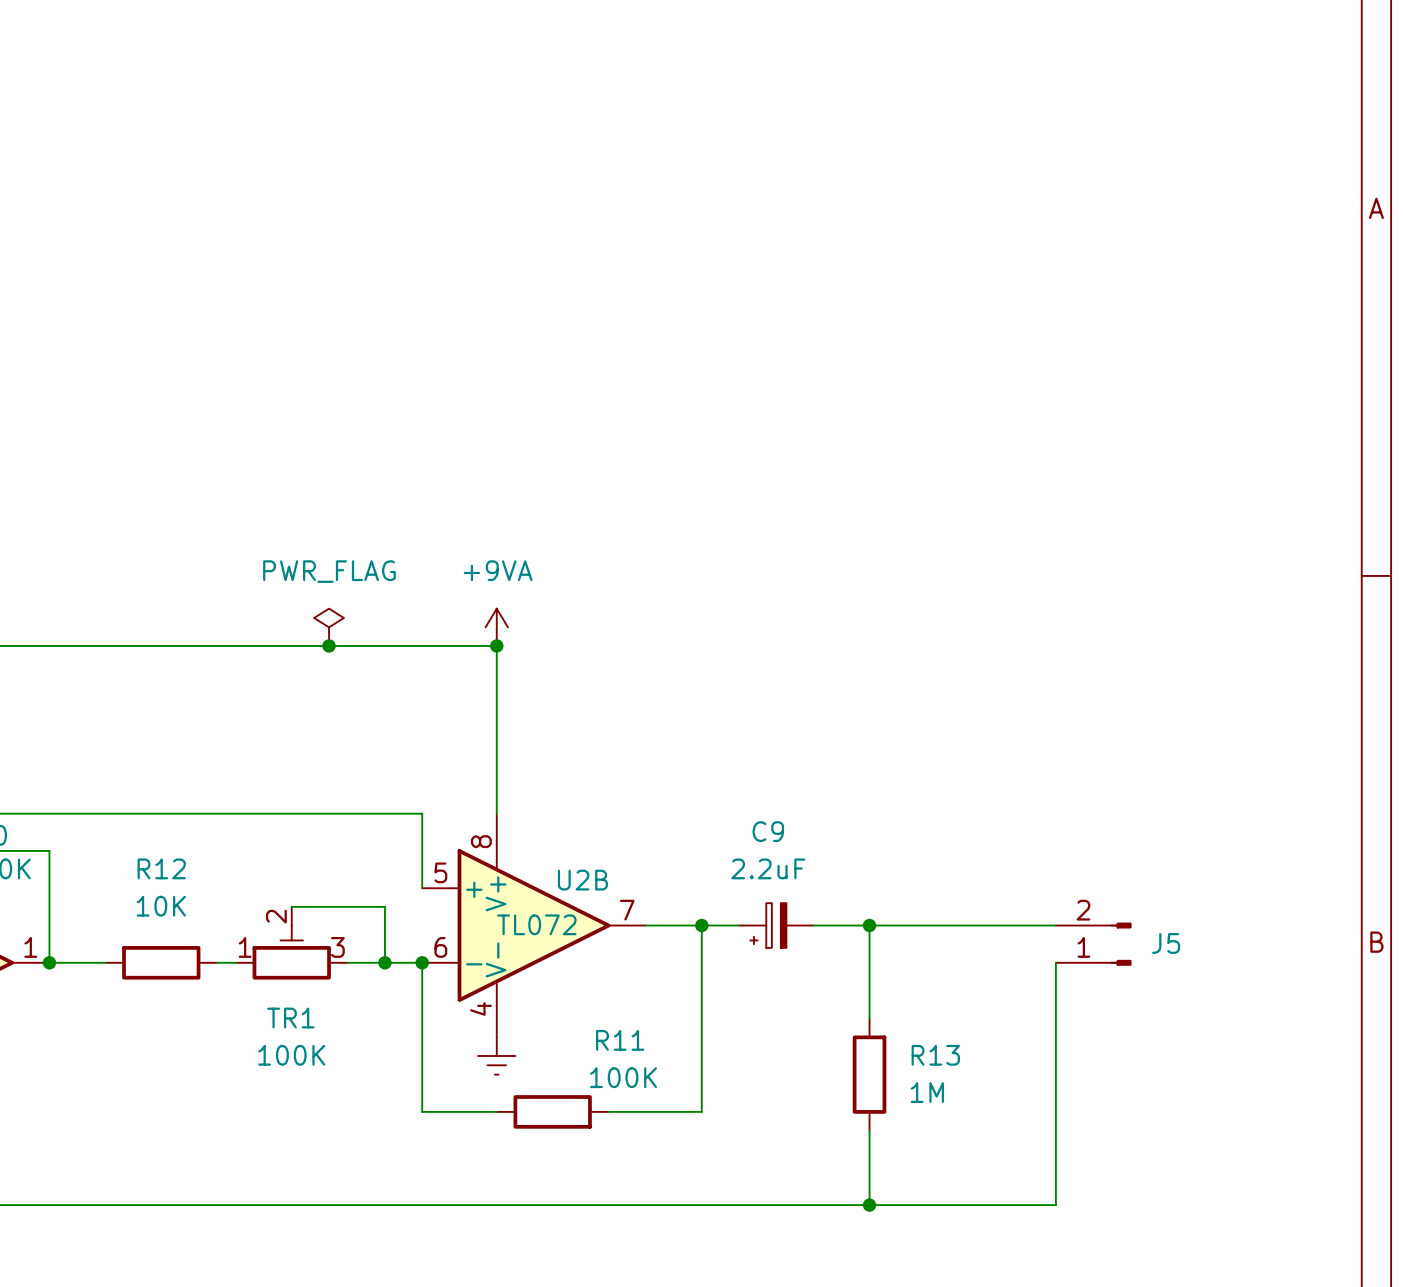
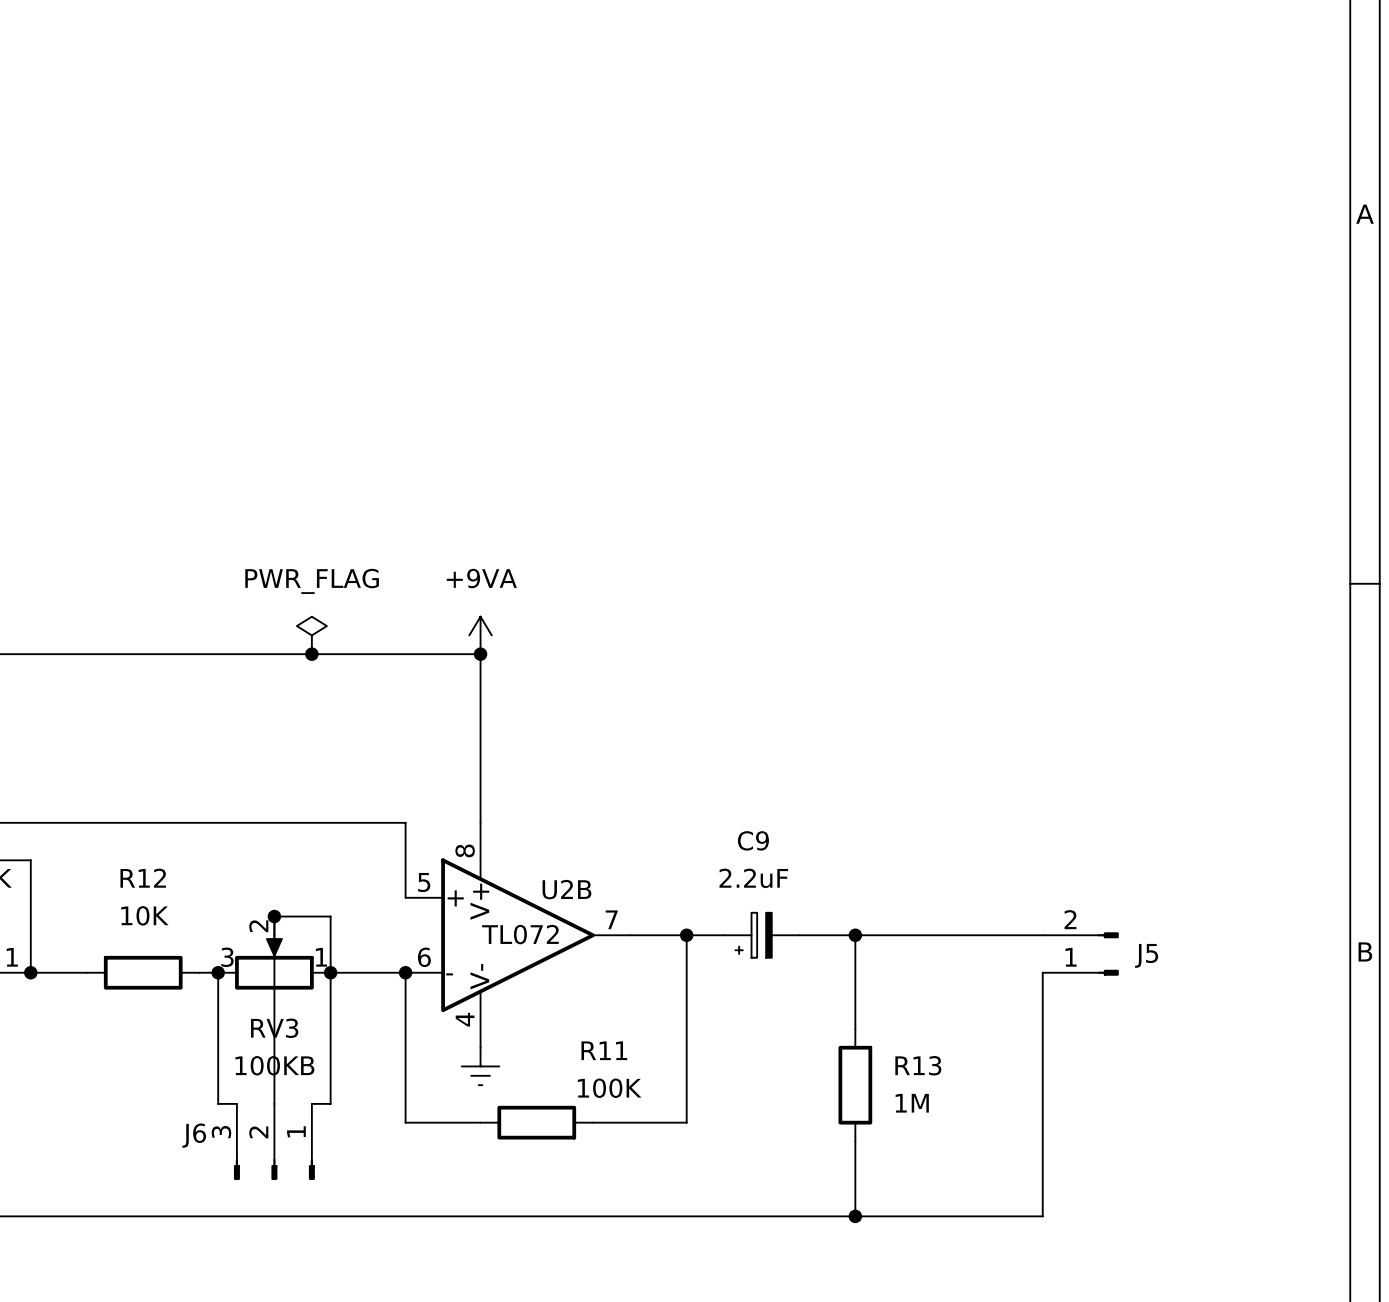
wire: none -> (274, 916) (274, 1103)
junction: none -> (274, 916)
wire: (347, 906) (384, 906) (384, 962) -> (330, 916) (330, 1103) (311, 1103)
TR1: 100K (291, 943) -> none
RV3: none -> 100KB (274, 953)
wire: none -> (218, 972) (218, 1103) (236, 1103)
junction: none -> (218, 972)
junction position: (384, 962) -> (330, 972)
J6: none -> (274, 1141)

